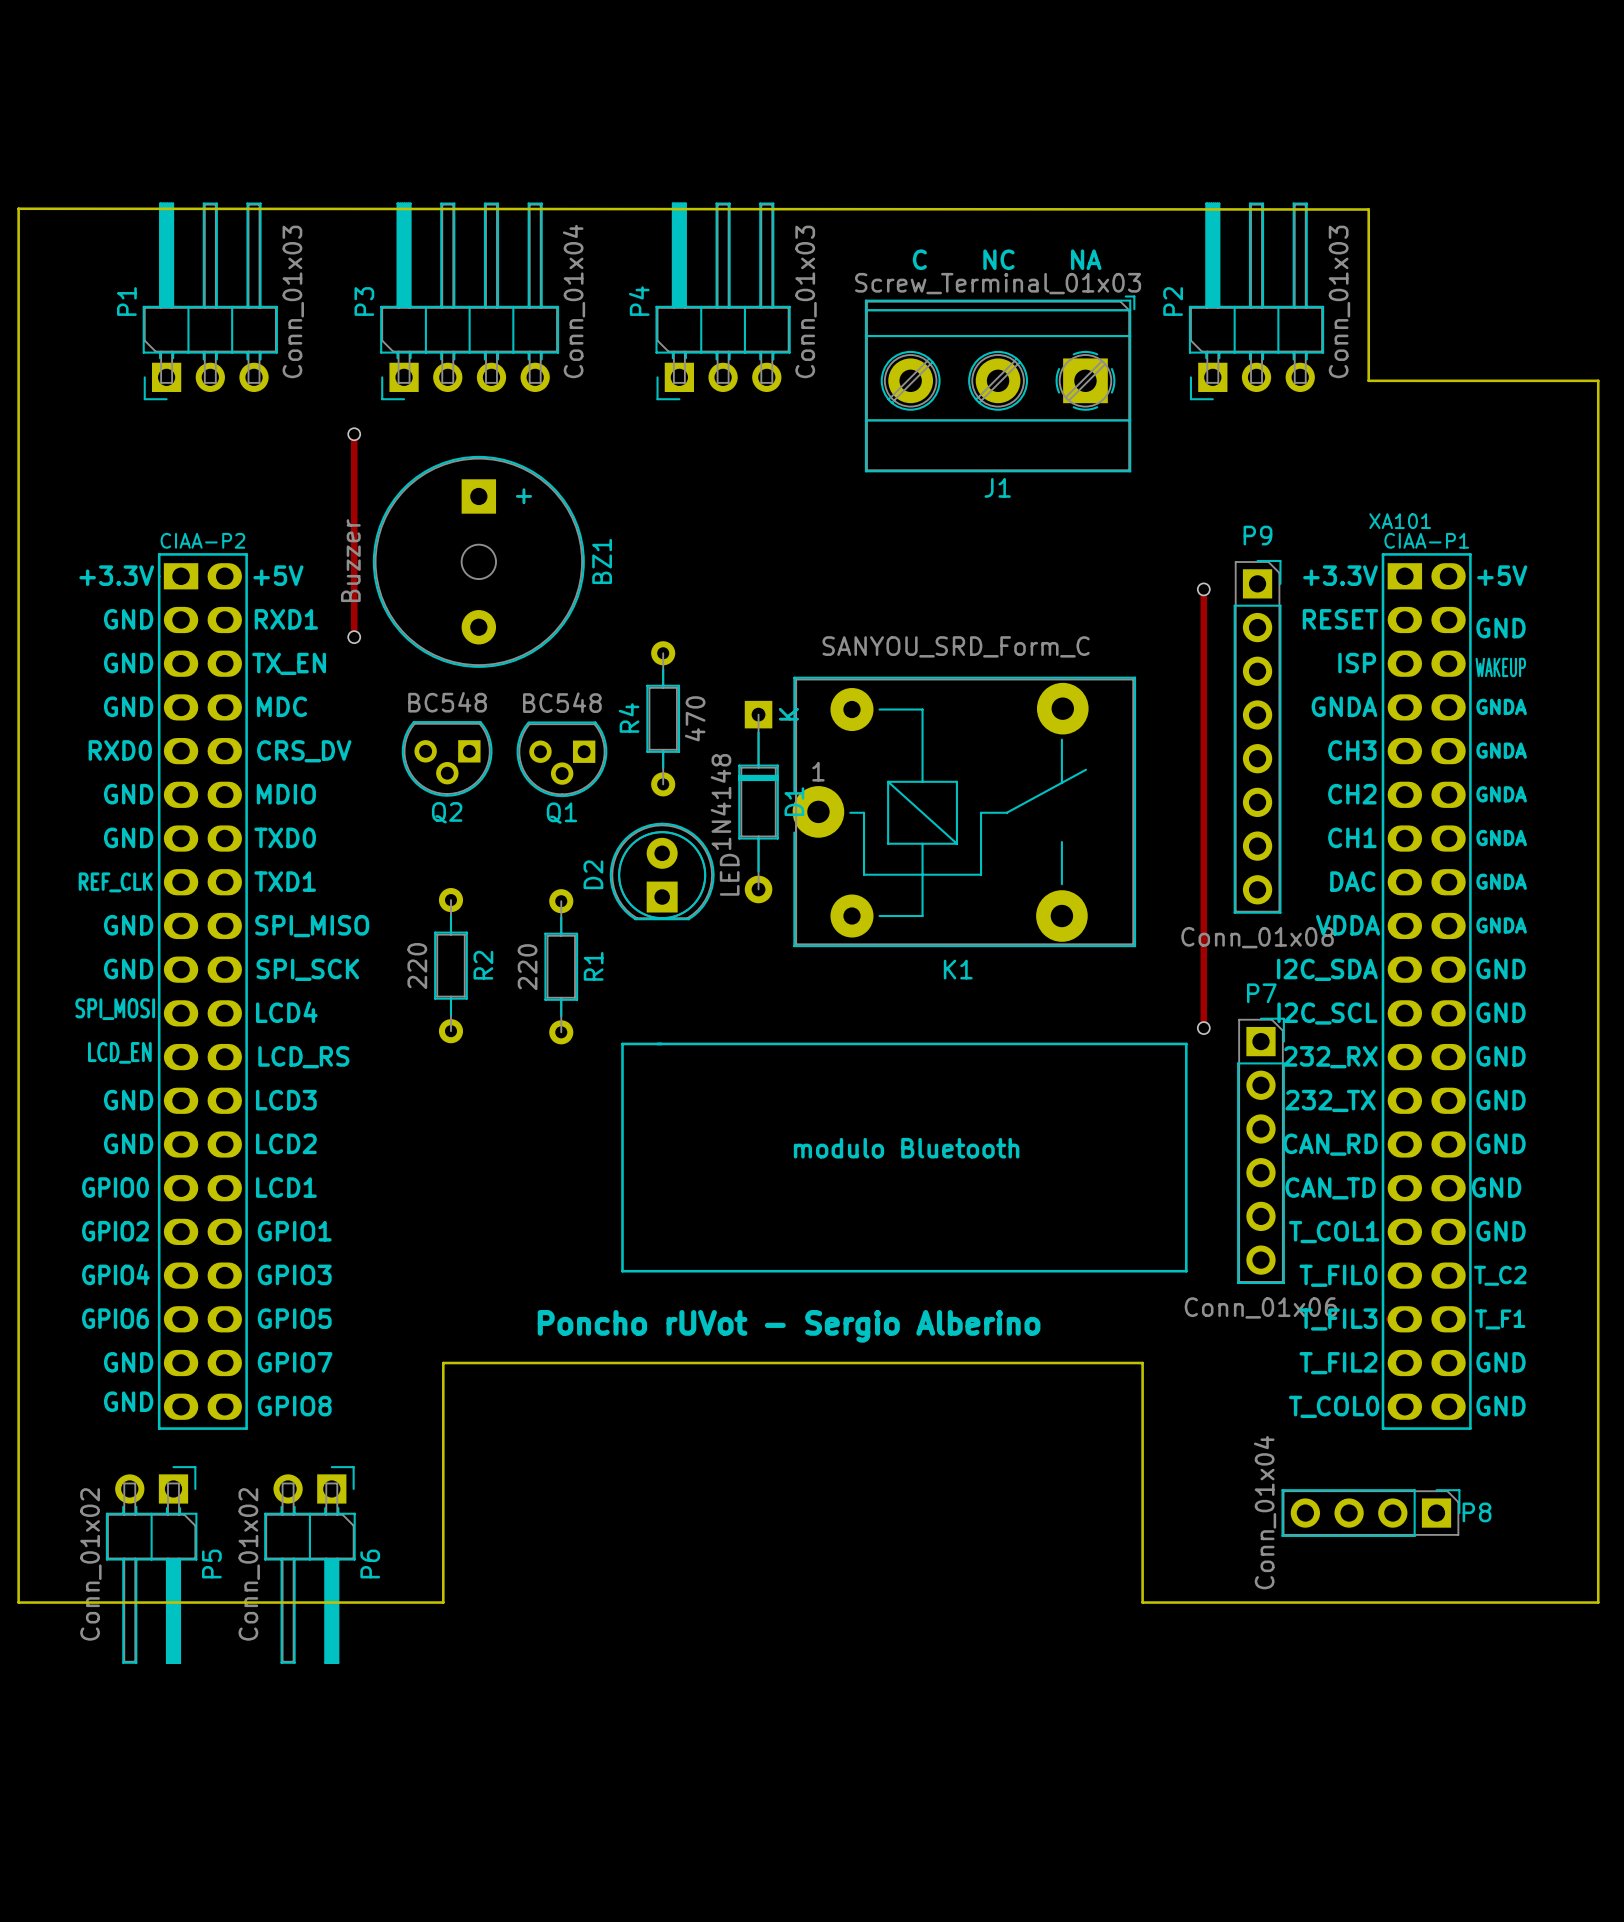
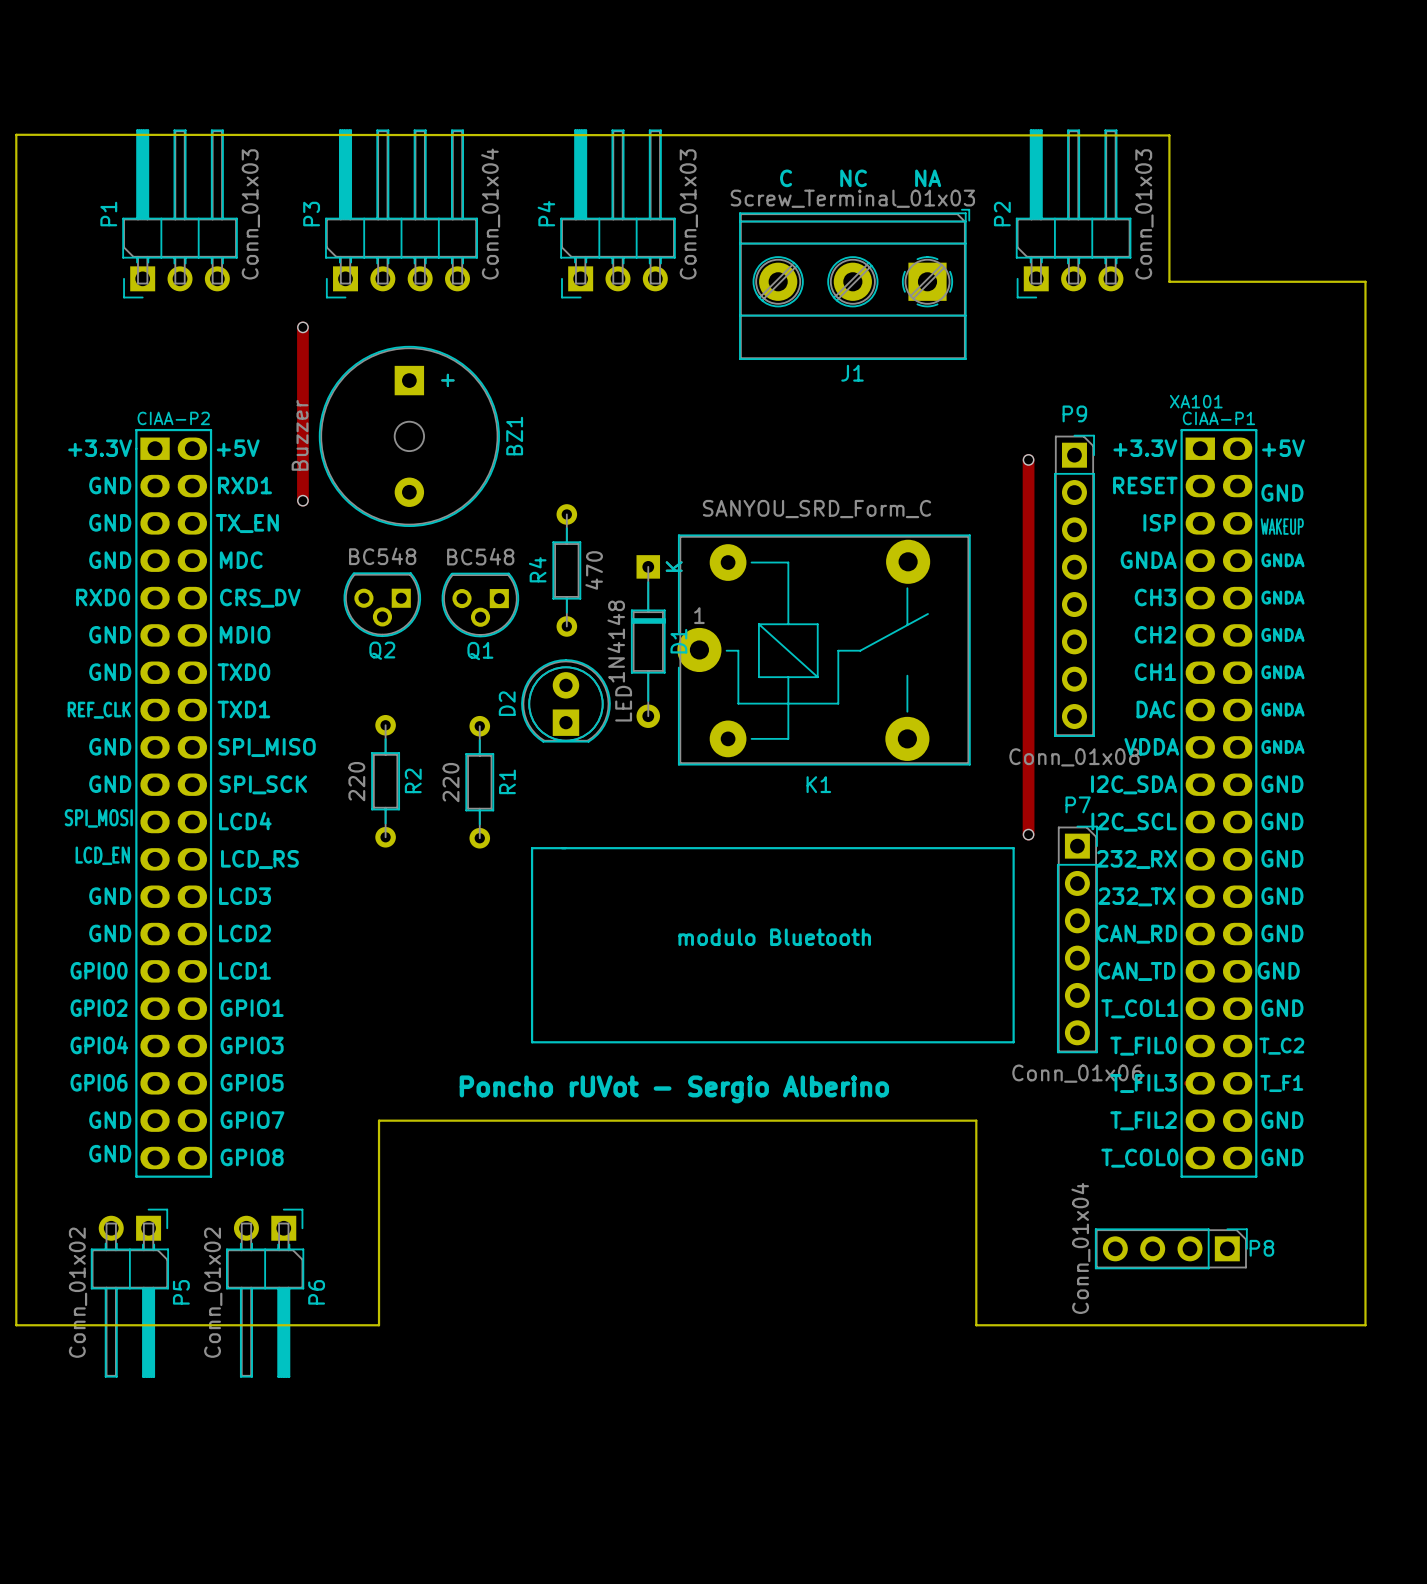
track width: thin (354, 434) (354, 637) -> thick (302, 327) (302, 500)
track width: thin (1203, 589) (1203, 1028) -> thick (1028, 459) (1028, 834)

